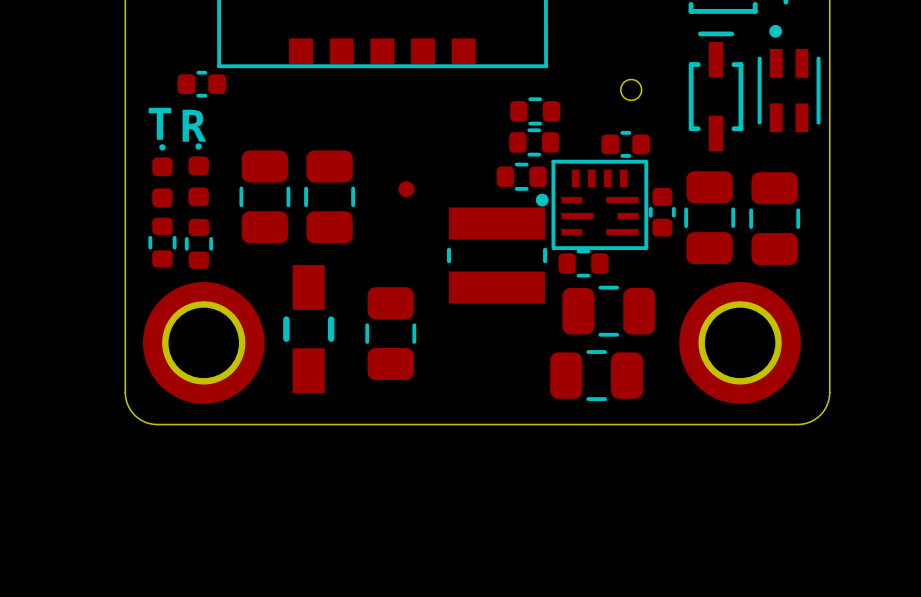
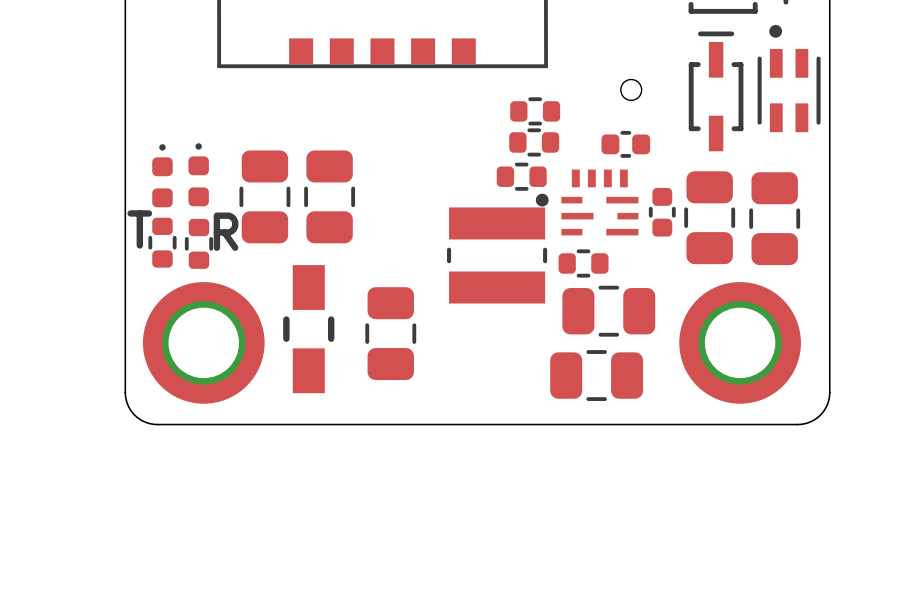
part: (201, 84) -> none
text position: T (159, 123) -> T (139, 229)
text position: R (194, 125) -> R (226, 231)
part footprint: [535, 159, 649, 251] -> [535, 169, 639, 236]
part: (406, 189) -> none

